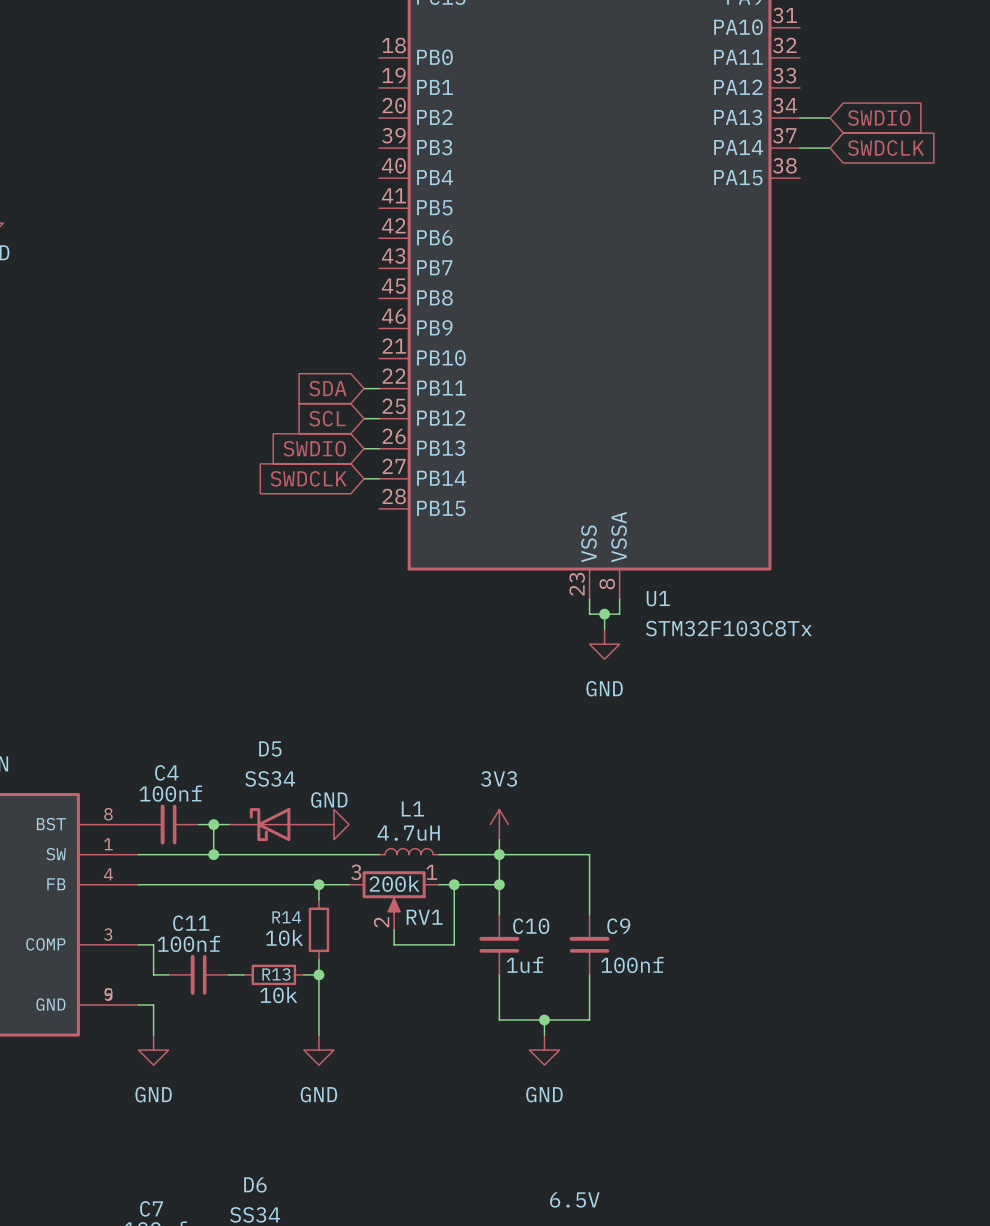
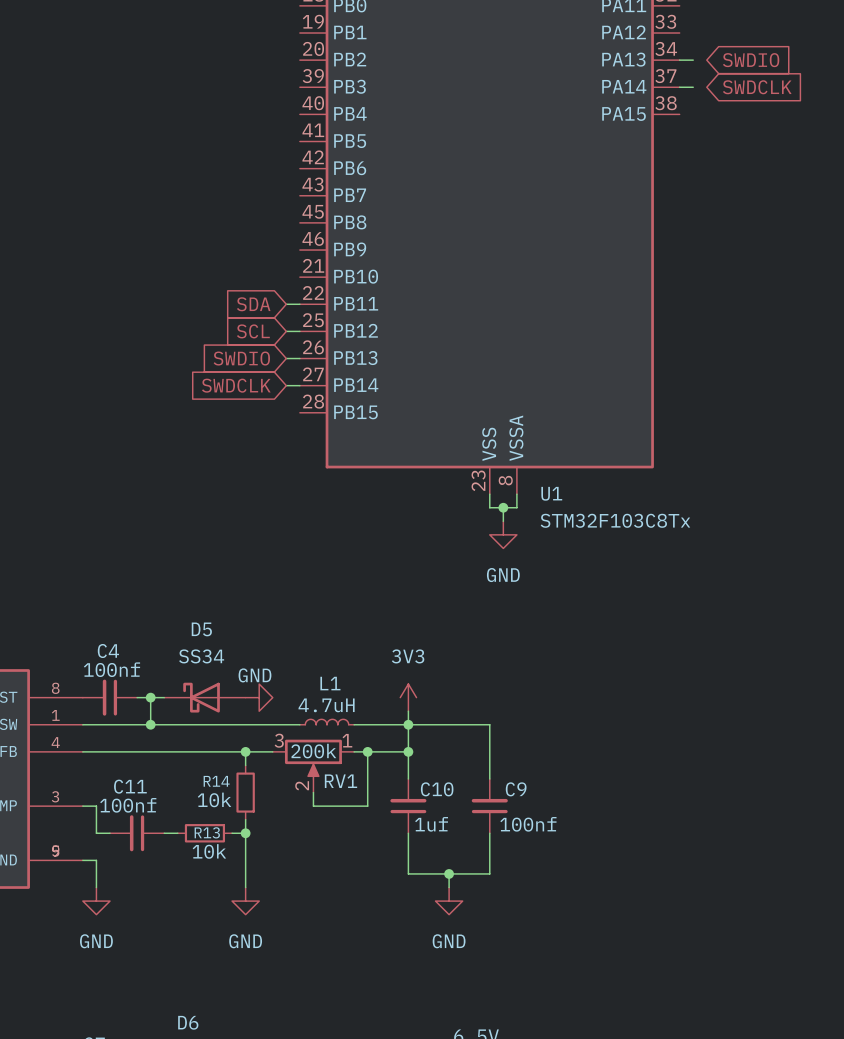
wire: (815, 118) (830, 118) -> none
wire: (815, 148) (830, 148) -> none

